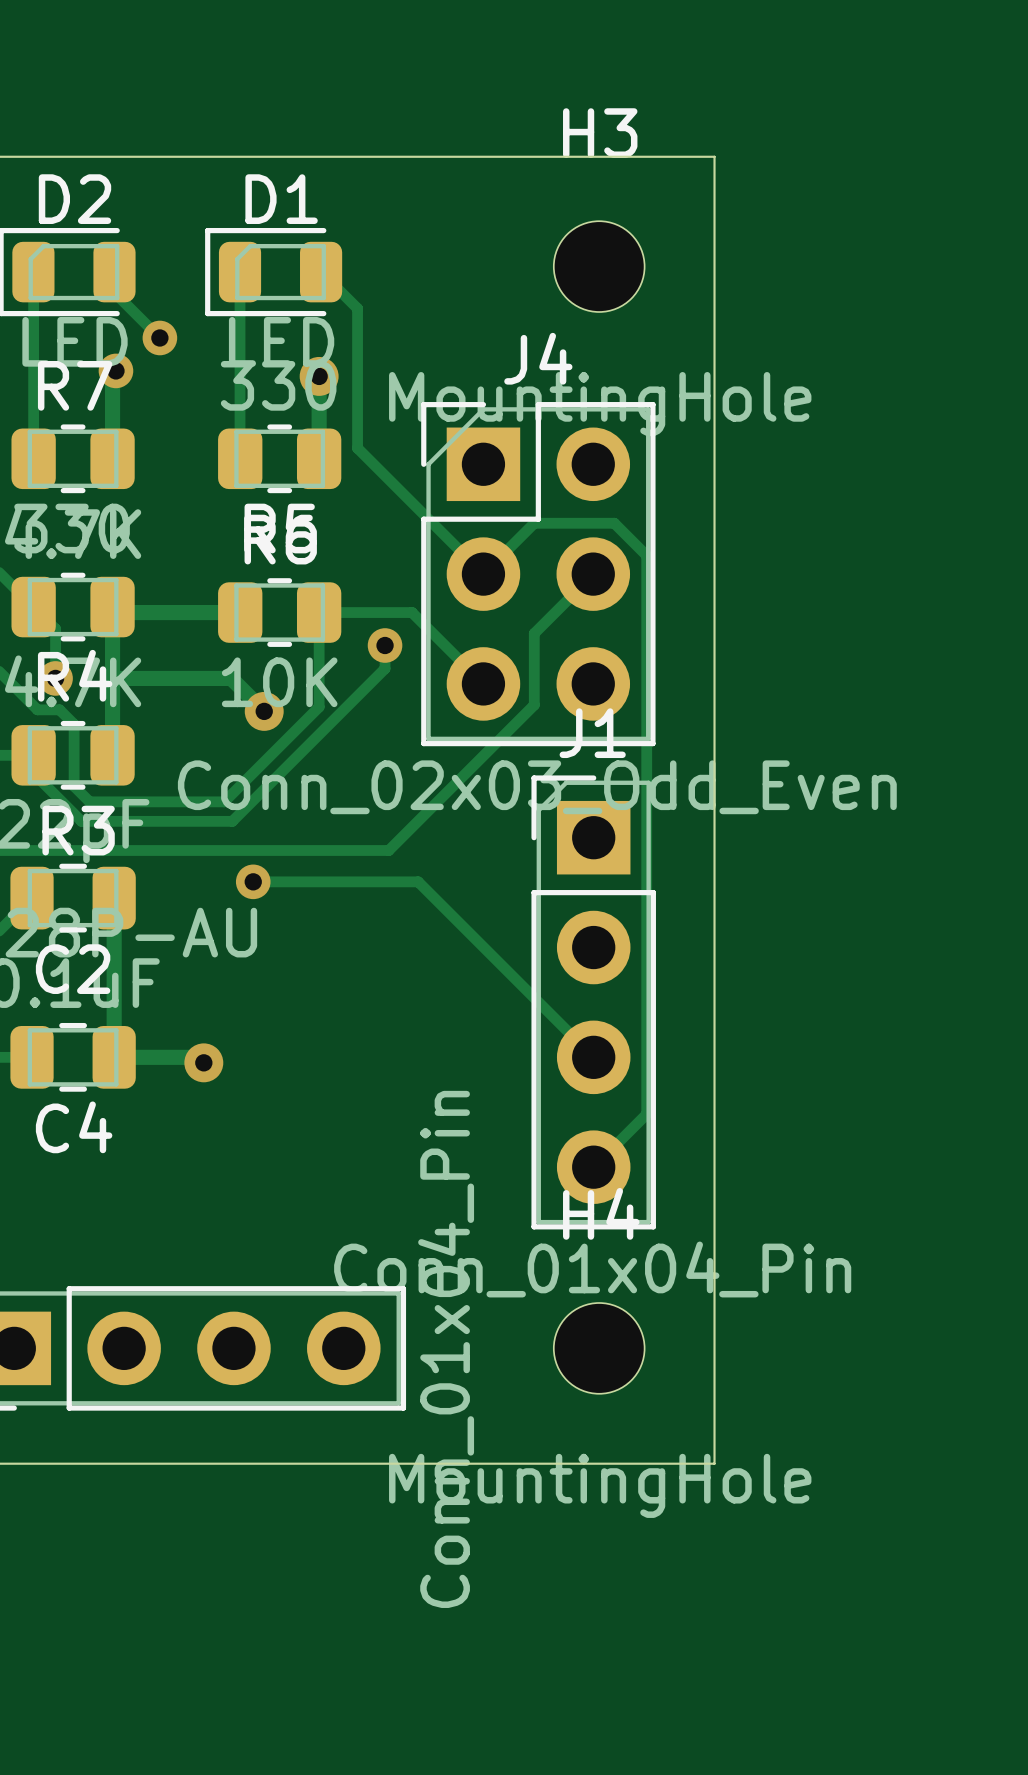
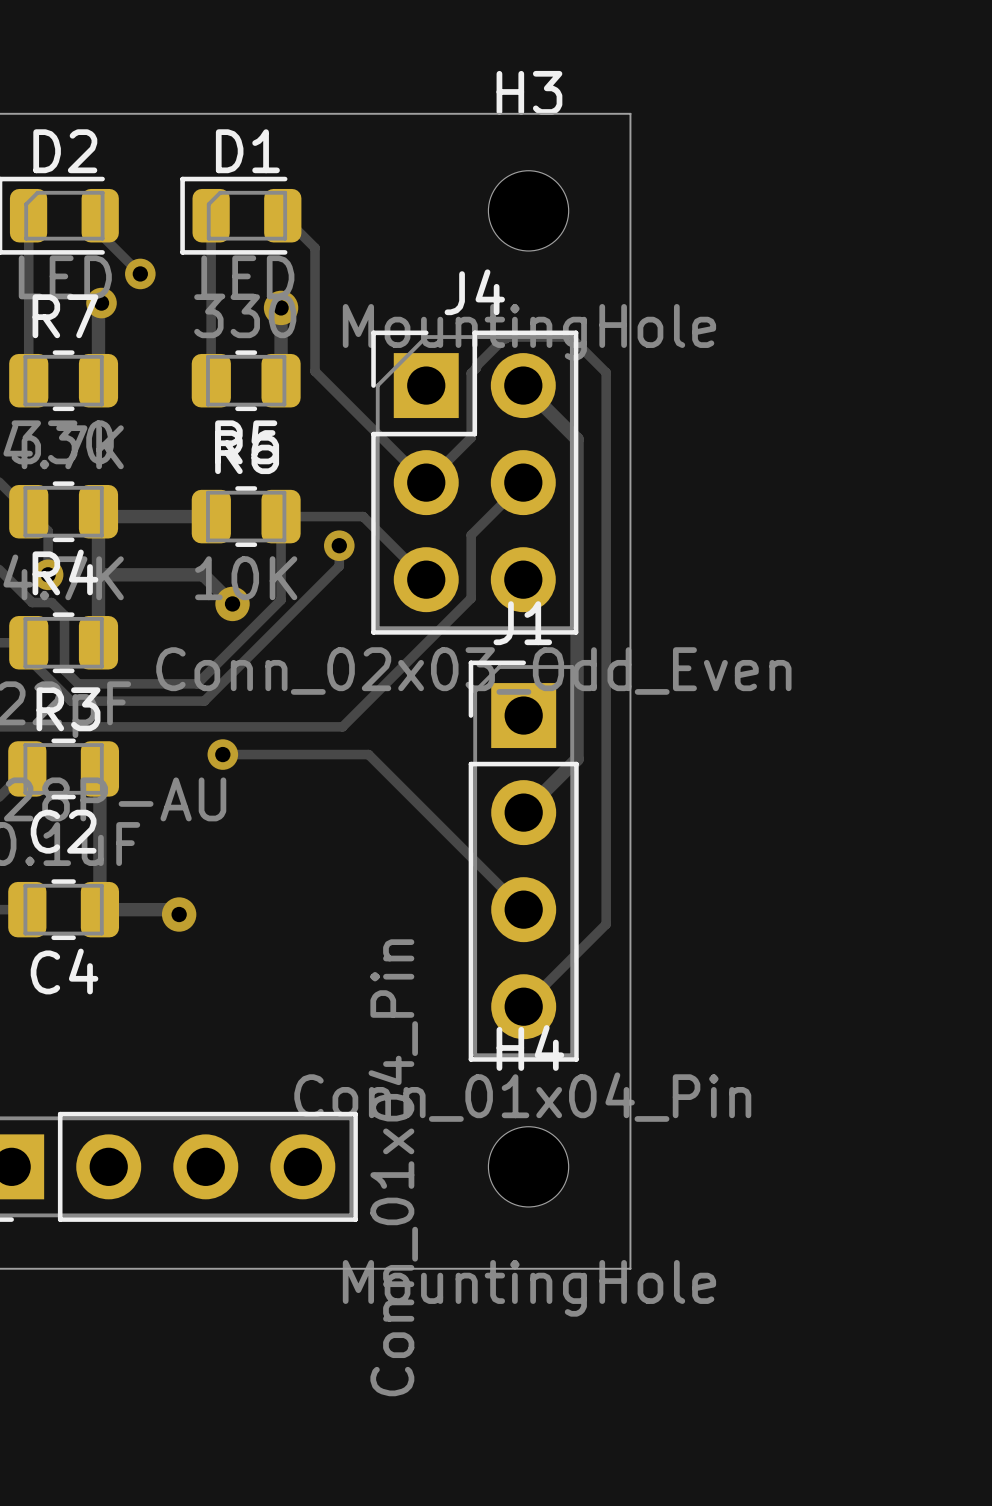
track: none -> (523, 385) (577, 439) (577, 759) (523, 812)
track: (534, 523) (614, 523) (646, 555) (646, 1114) -> (471, 437) (471, 373) (503, 338) (507, 337) (570, 337) (606, 372) (606, 924) (570, 959)

